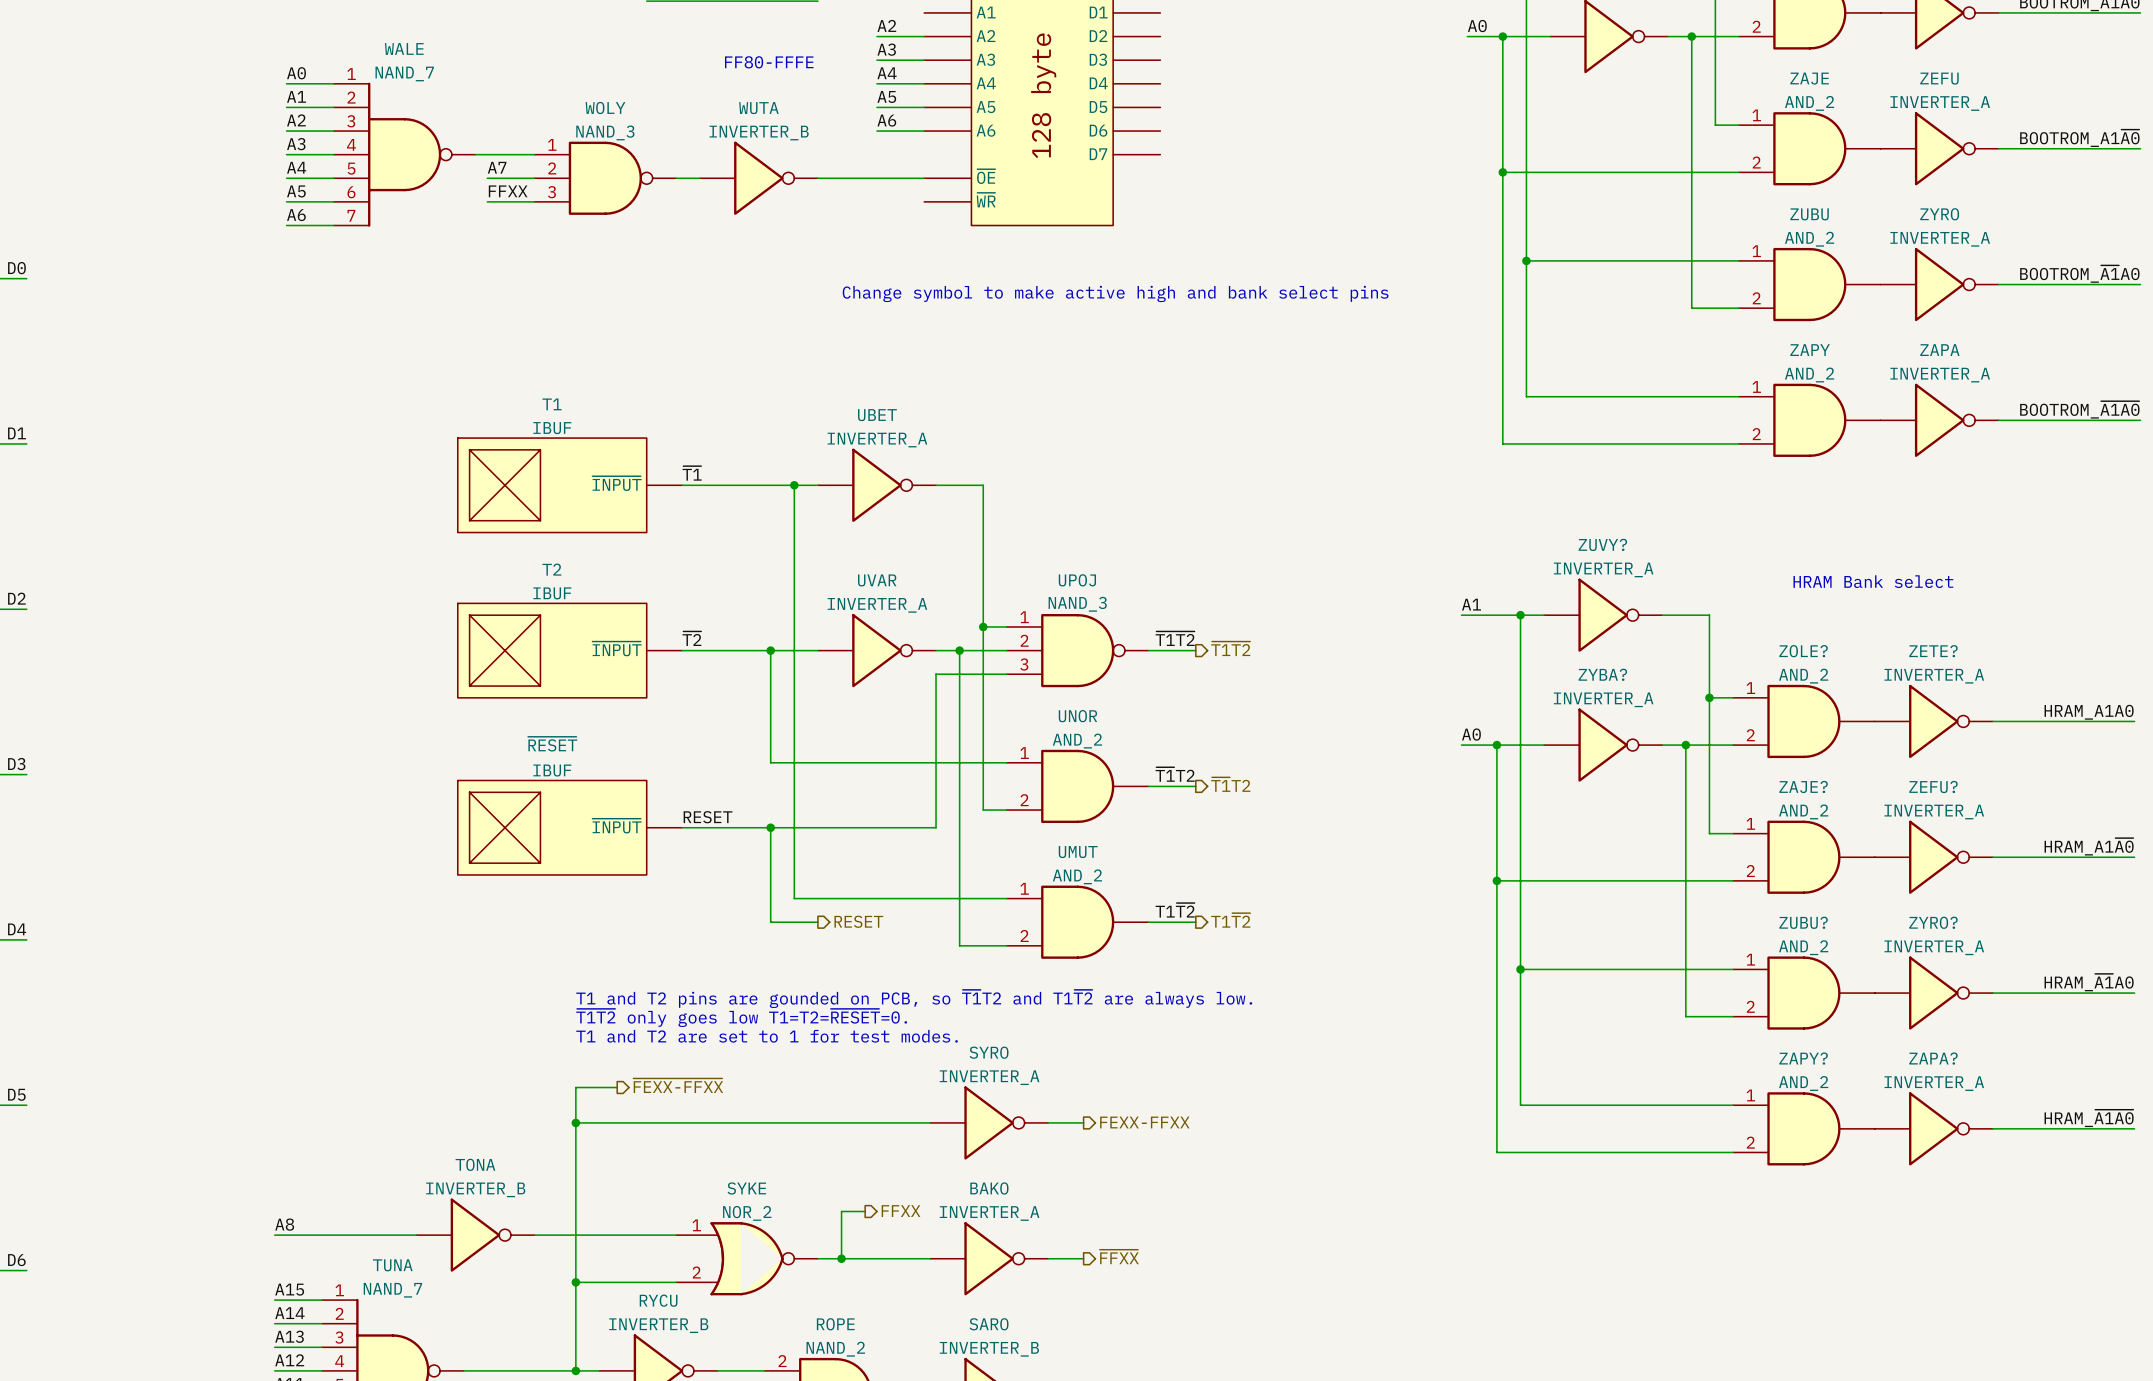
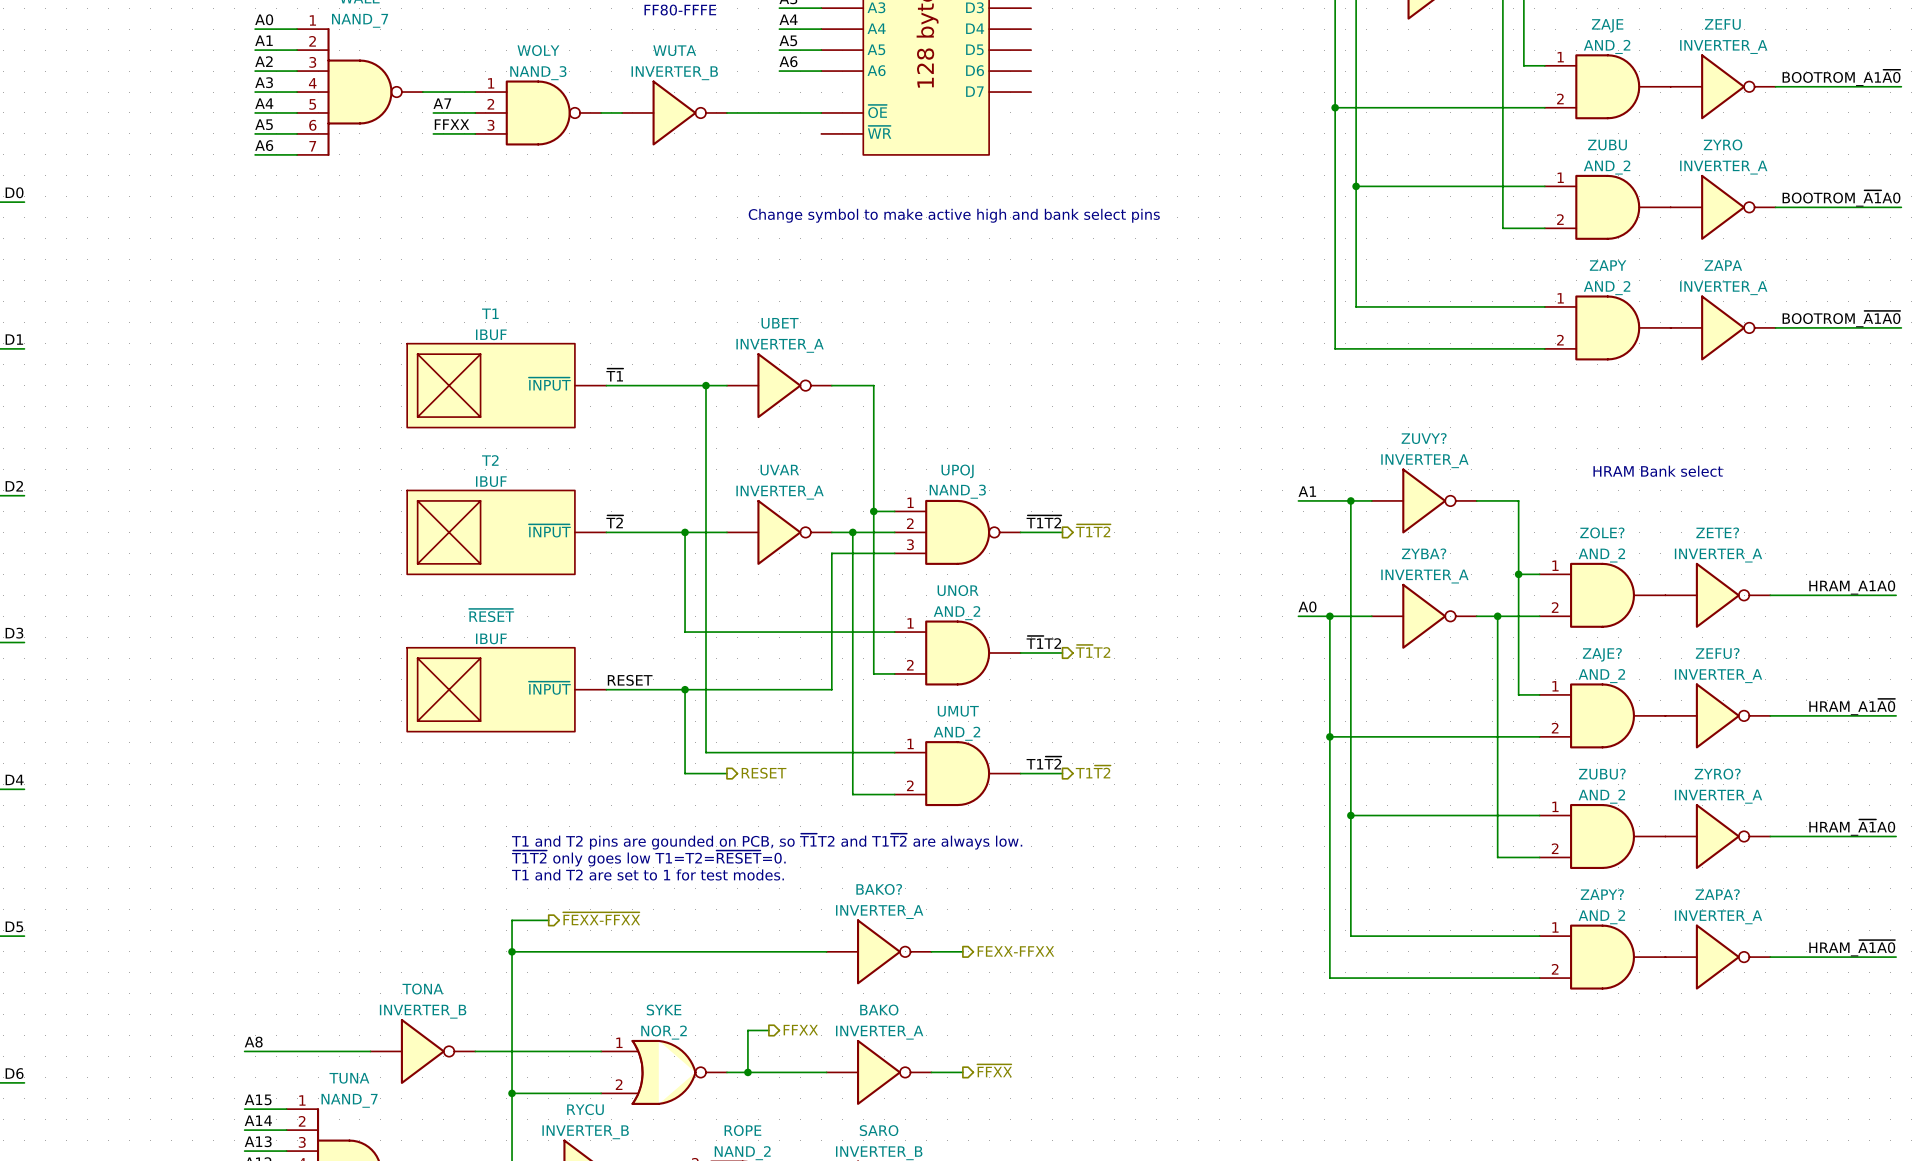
SYRO name: SYRO (989, 1052) -> BAKO? (879, 889)

